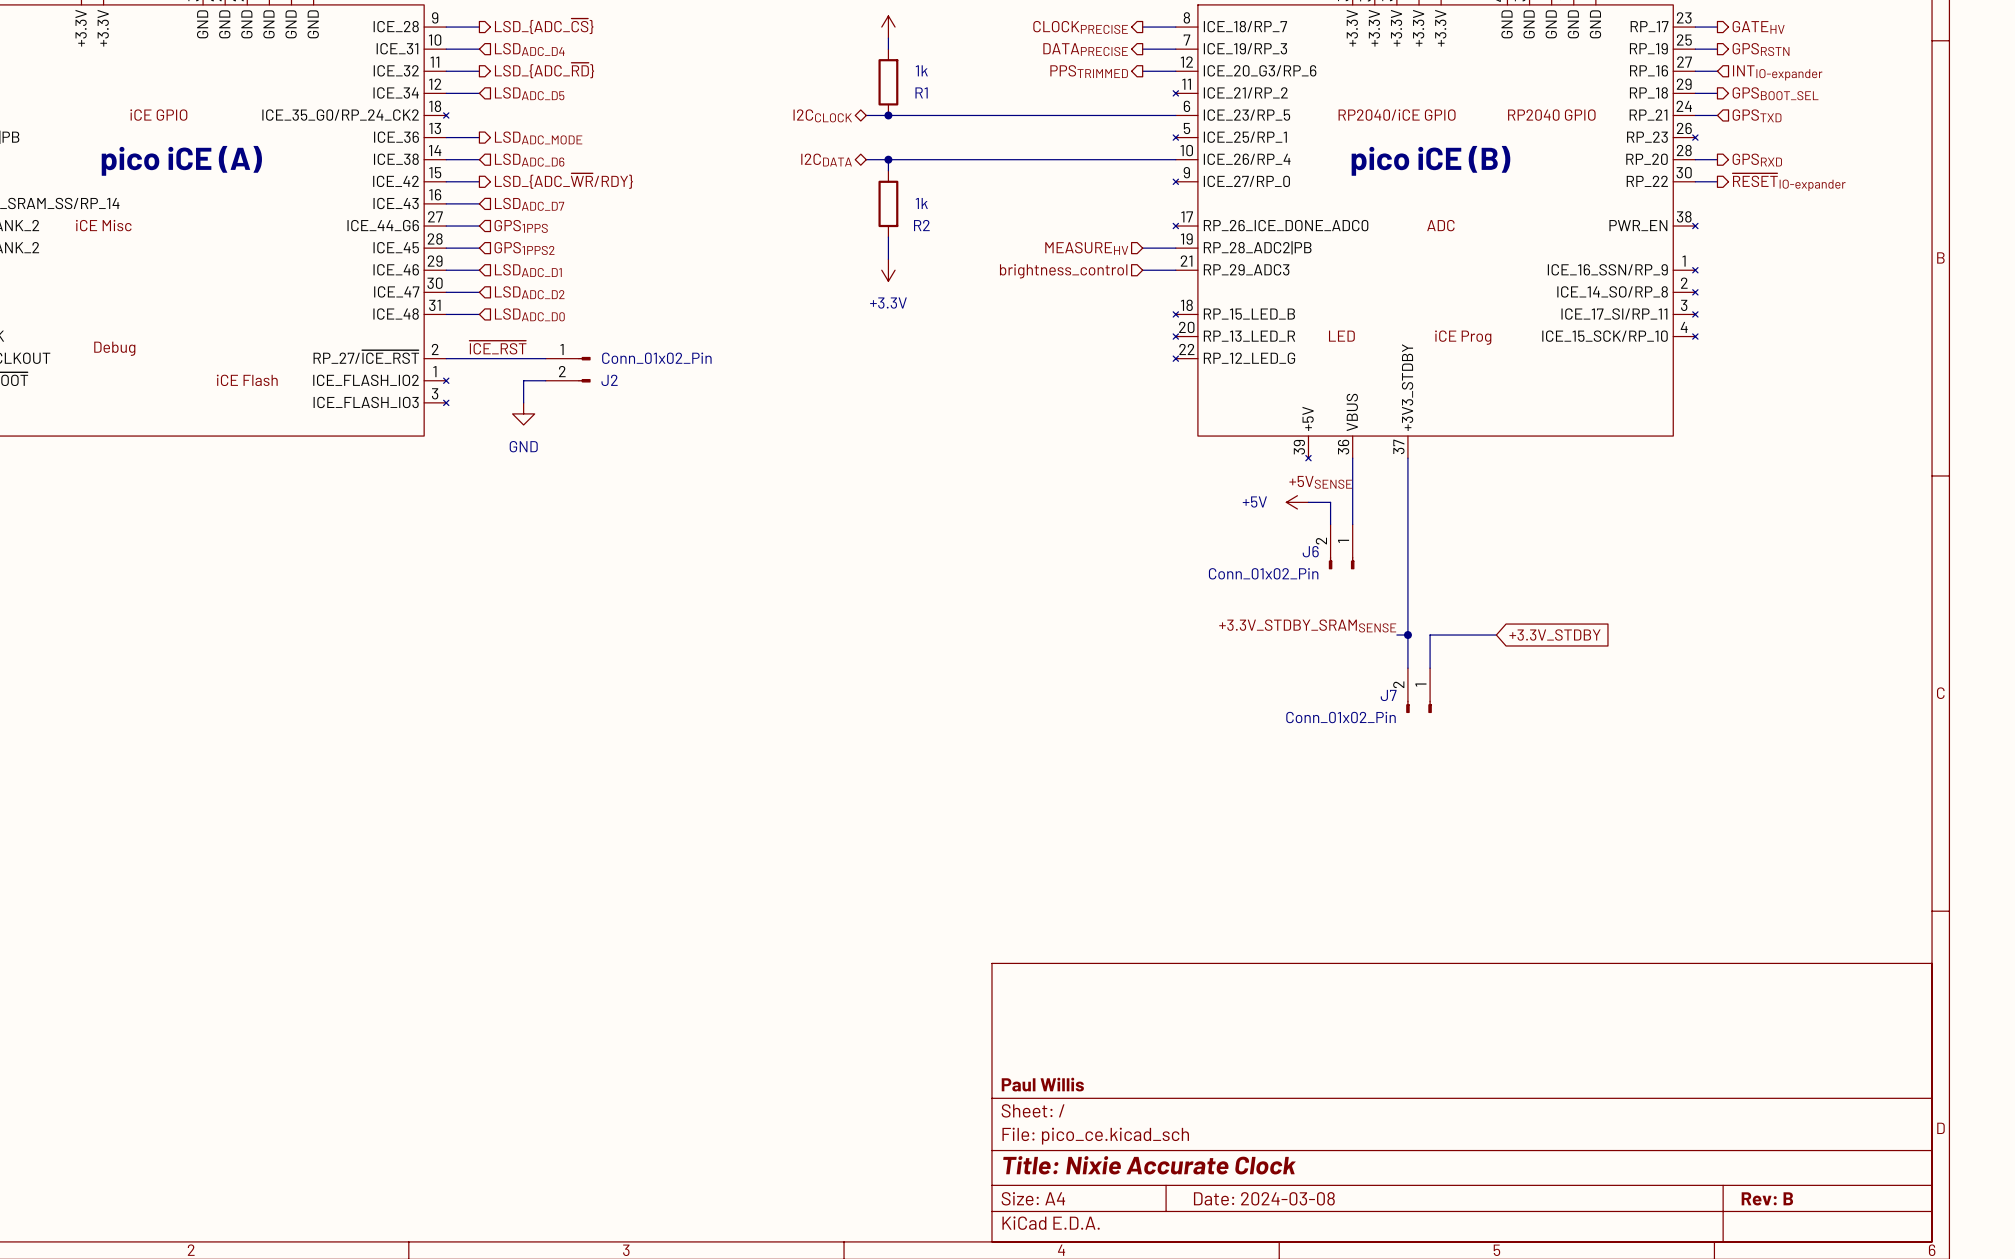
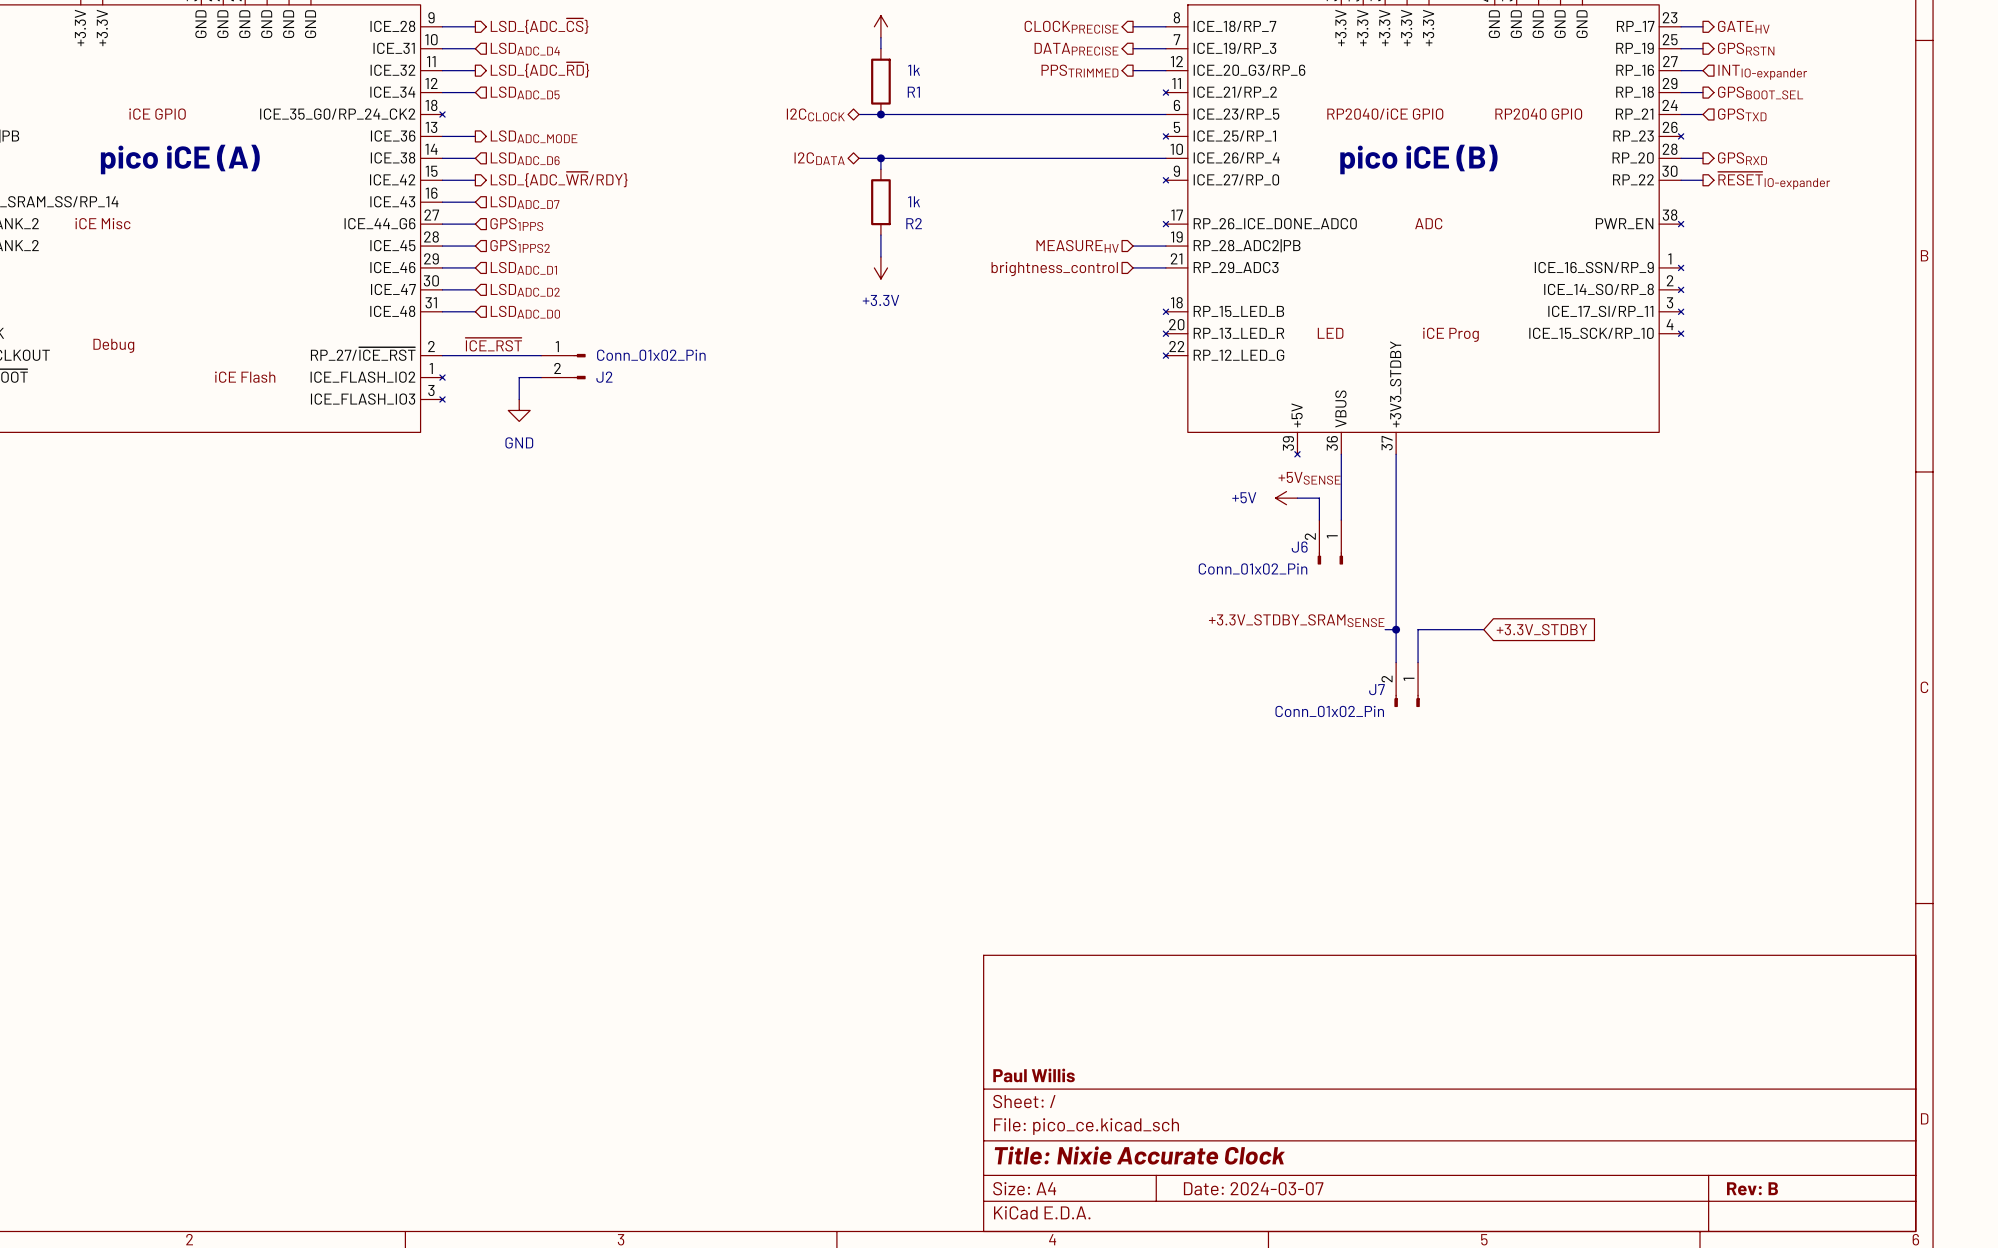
title block: Date: 2024-03-08 (1264, 1198) -> Date: 2024-03-07 (1253, 1188)

